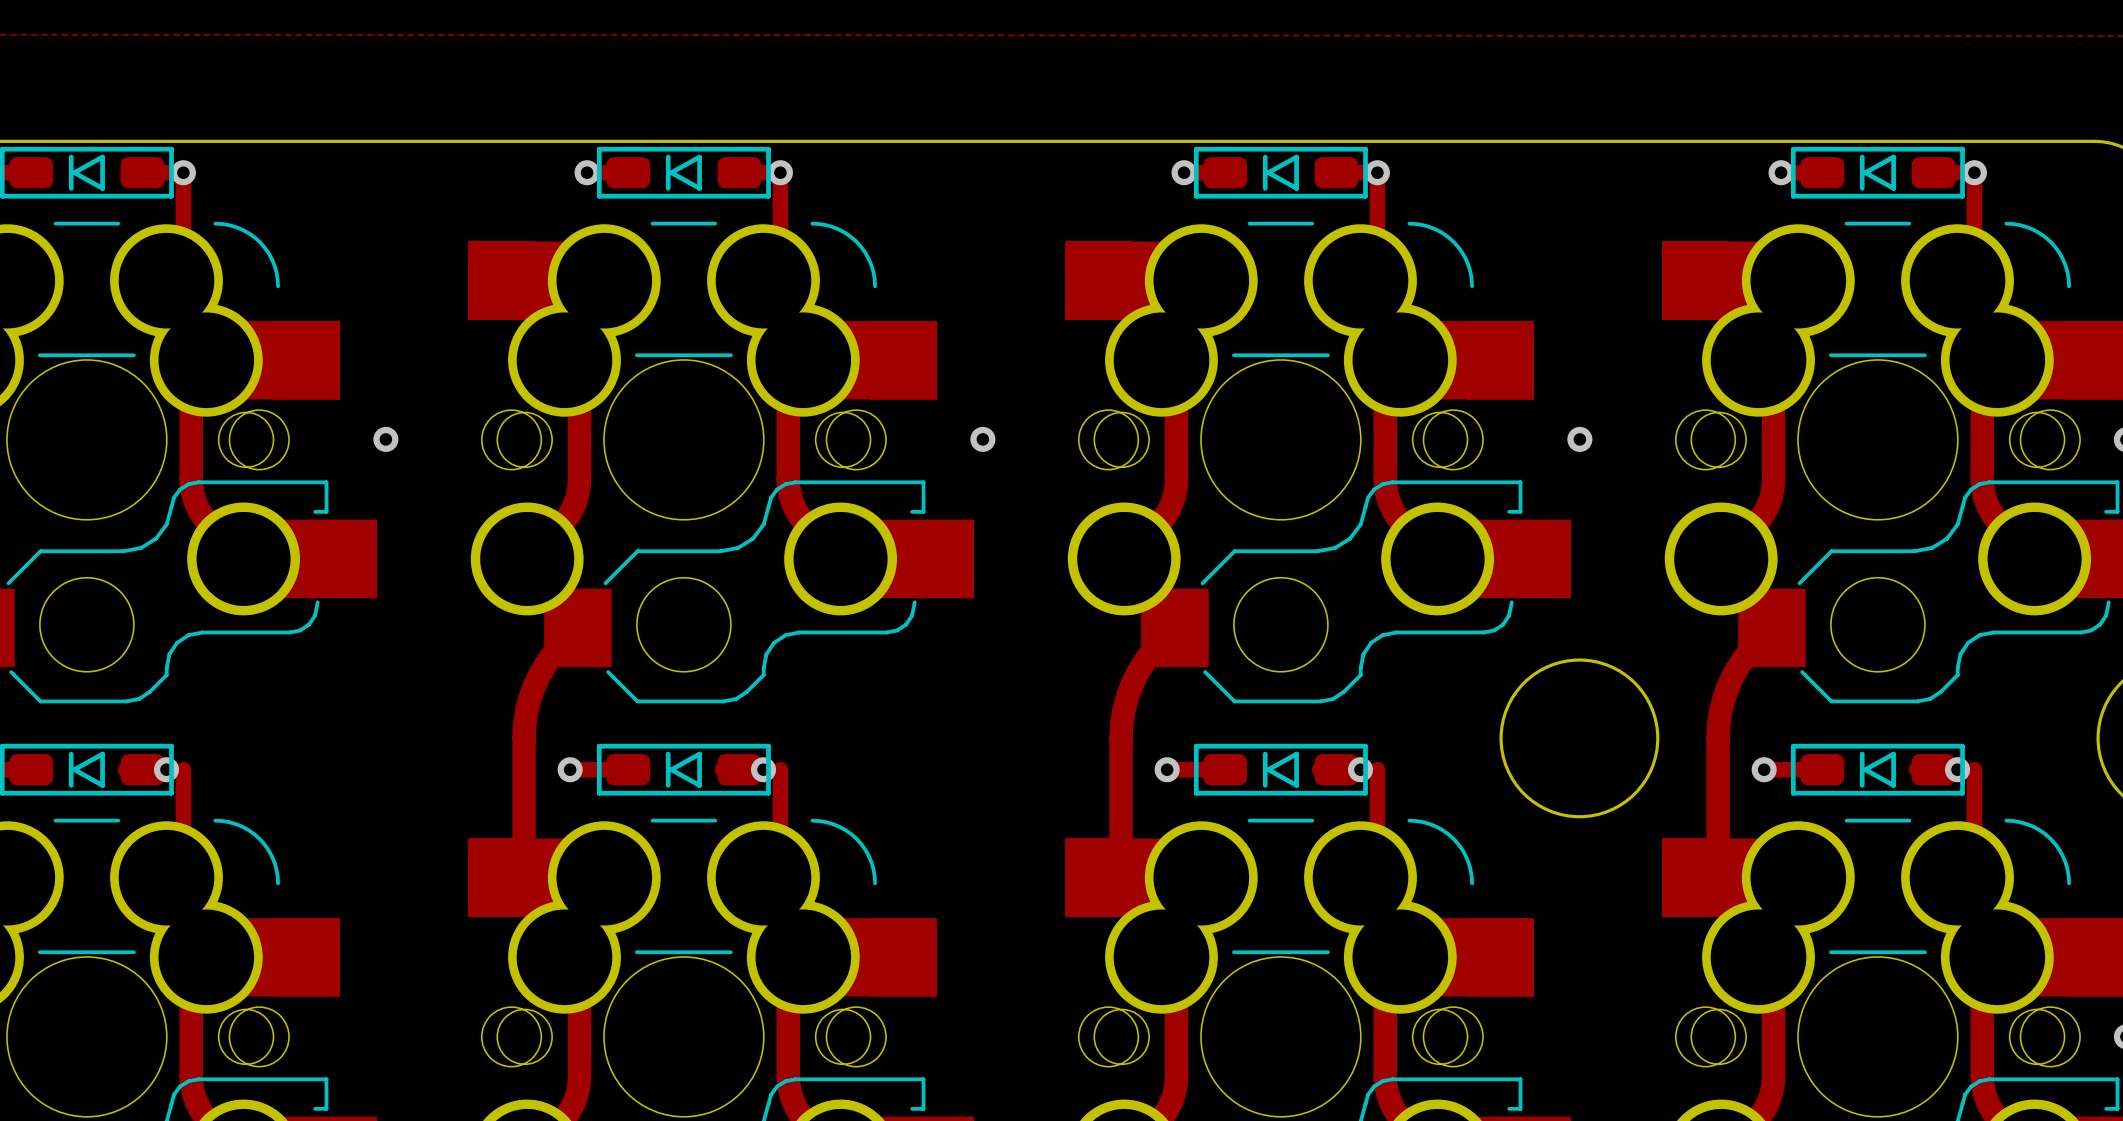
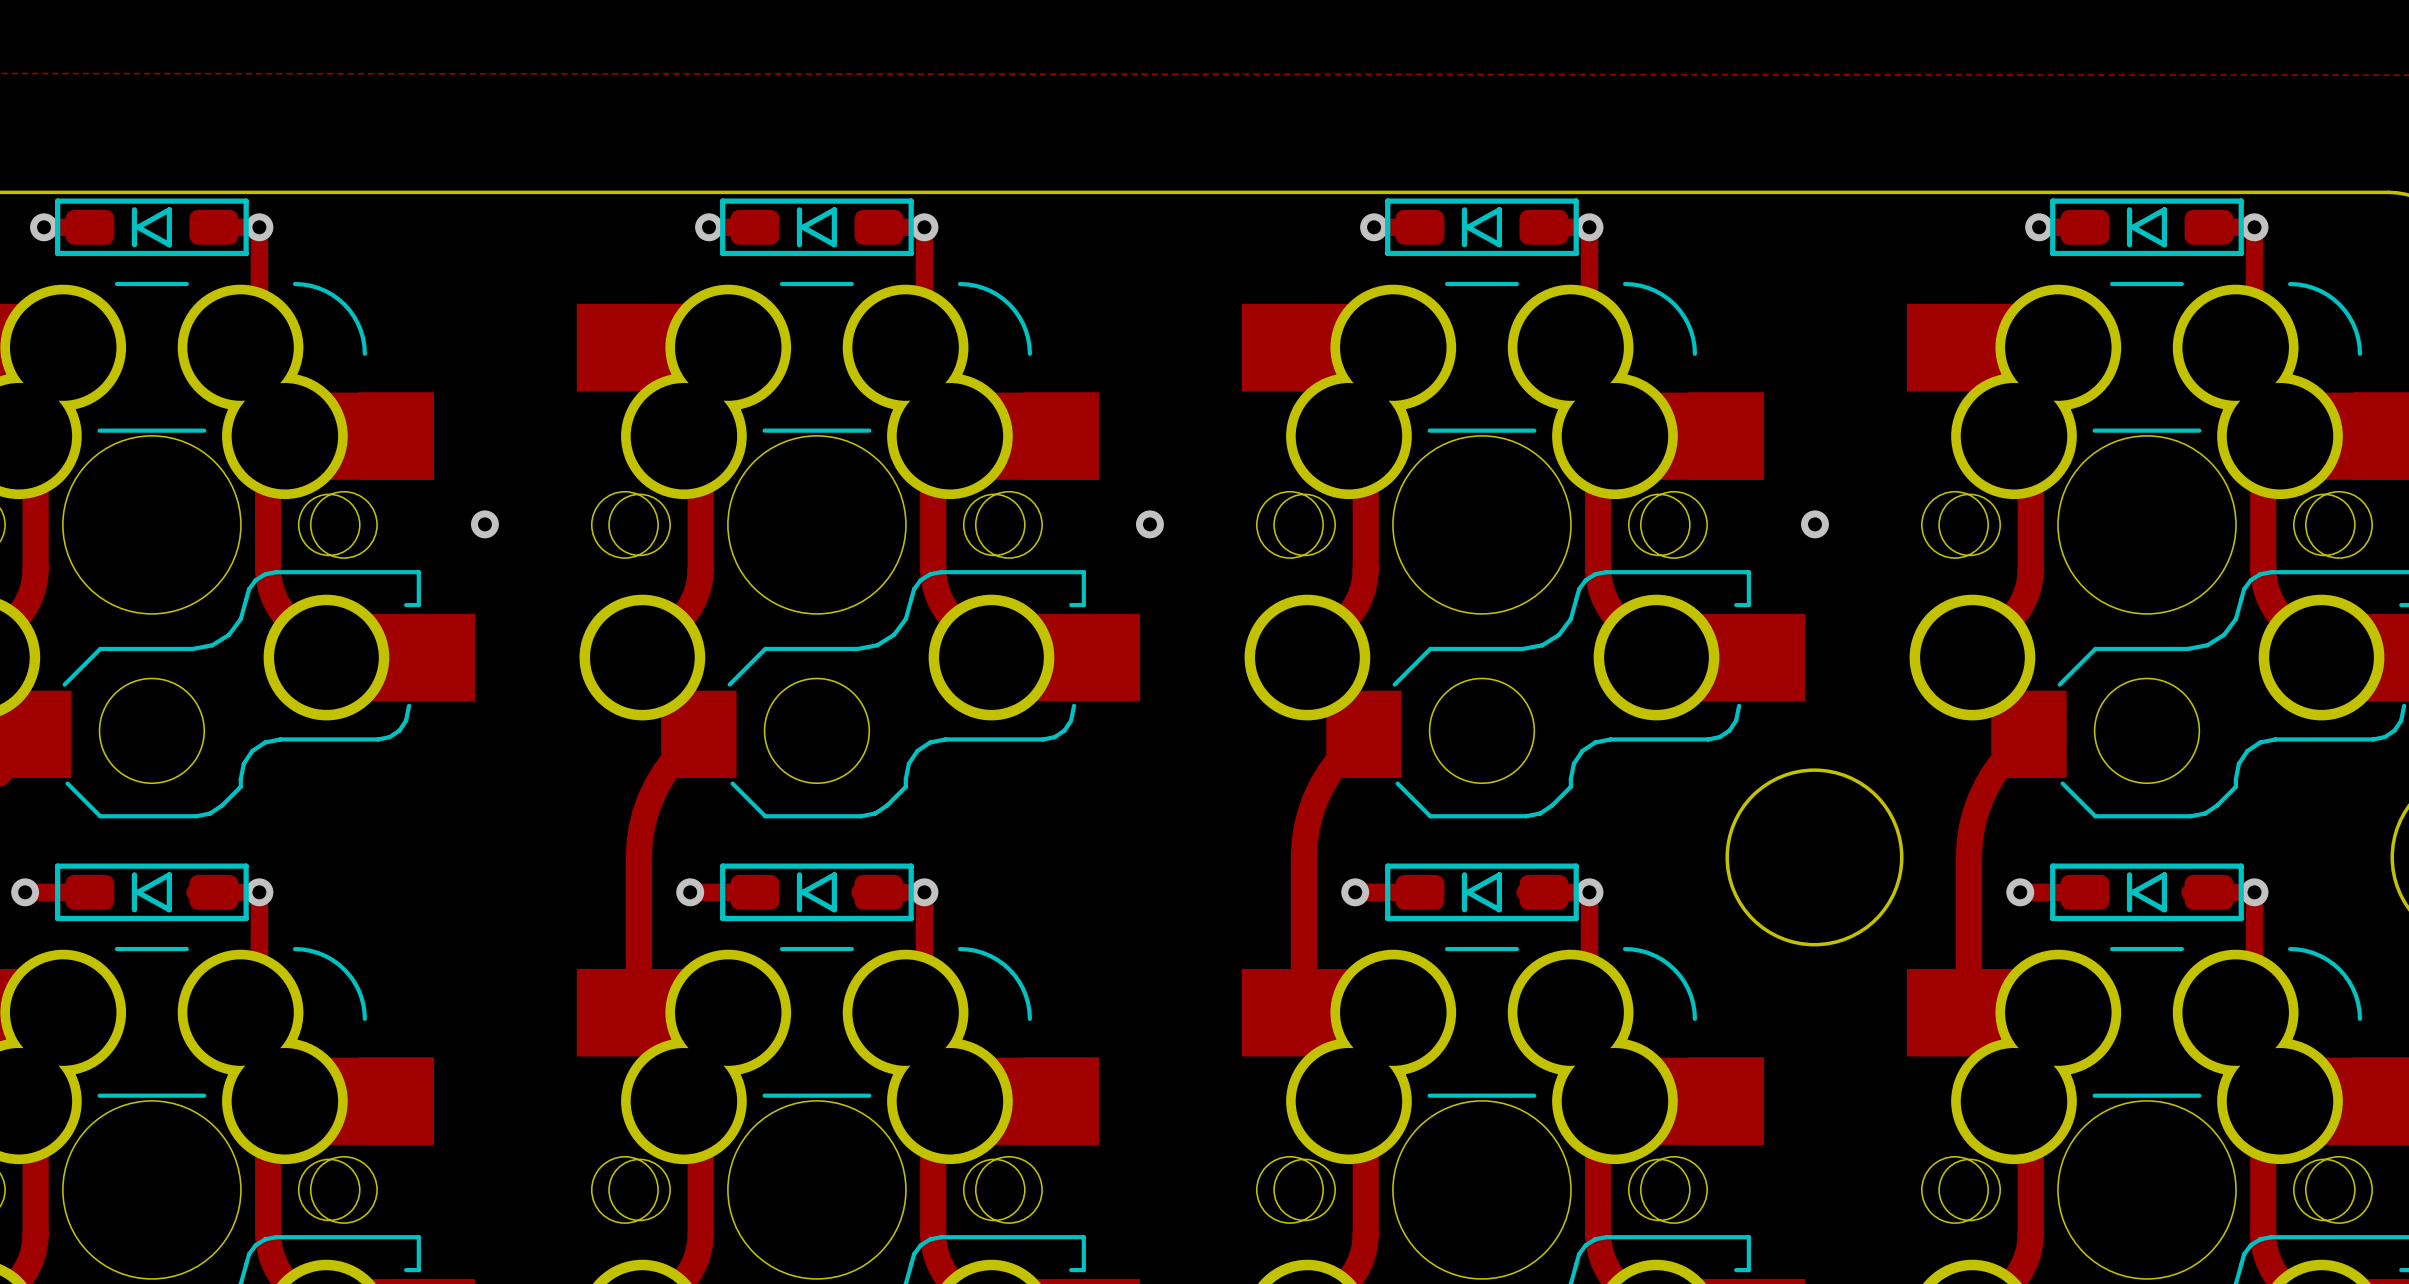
via position: (166, 769) -> (259, 892)
via position: (763, 769) -> (924, 892)
via position: (1360, 769) -> (1589, 892)
via position: (1957, 769) -> (2254, 892)

